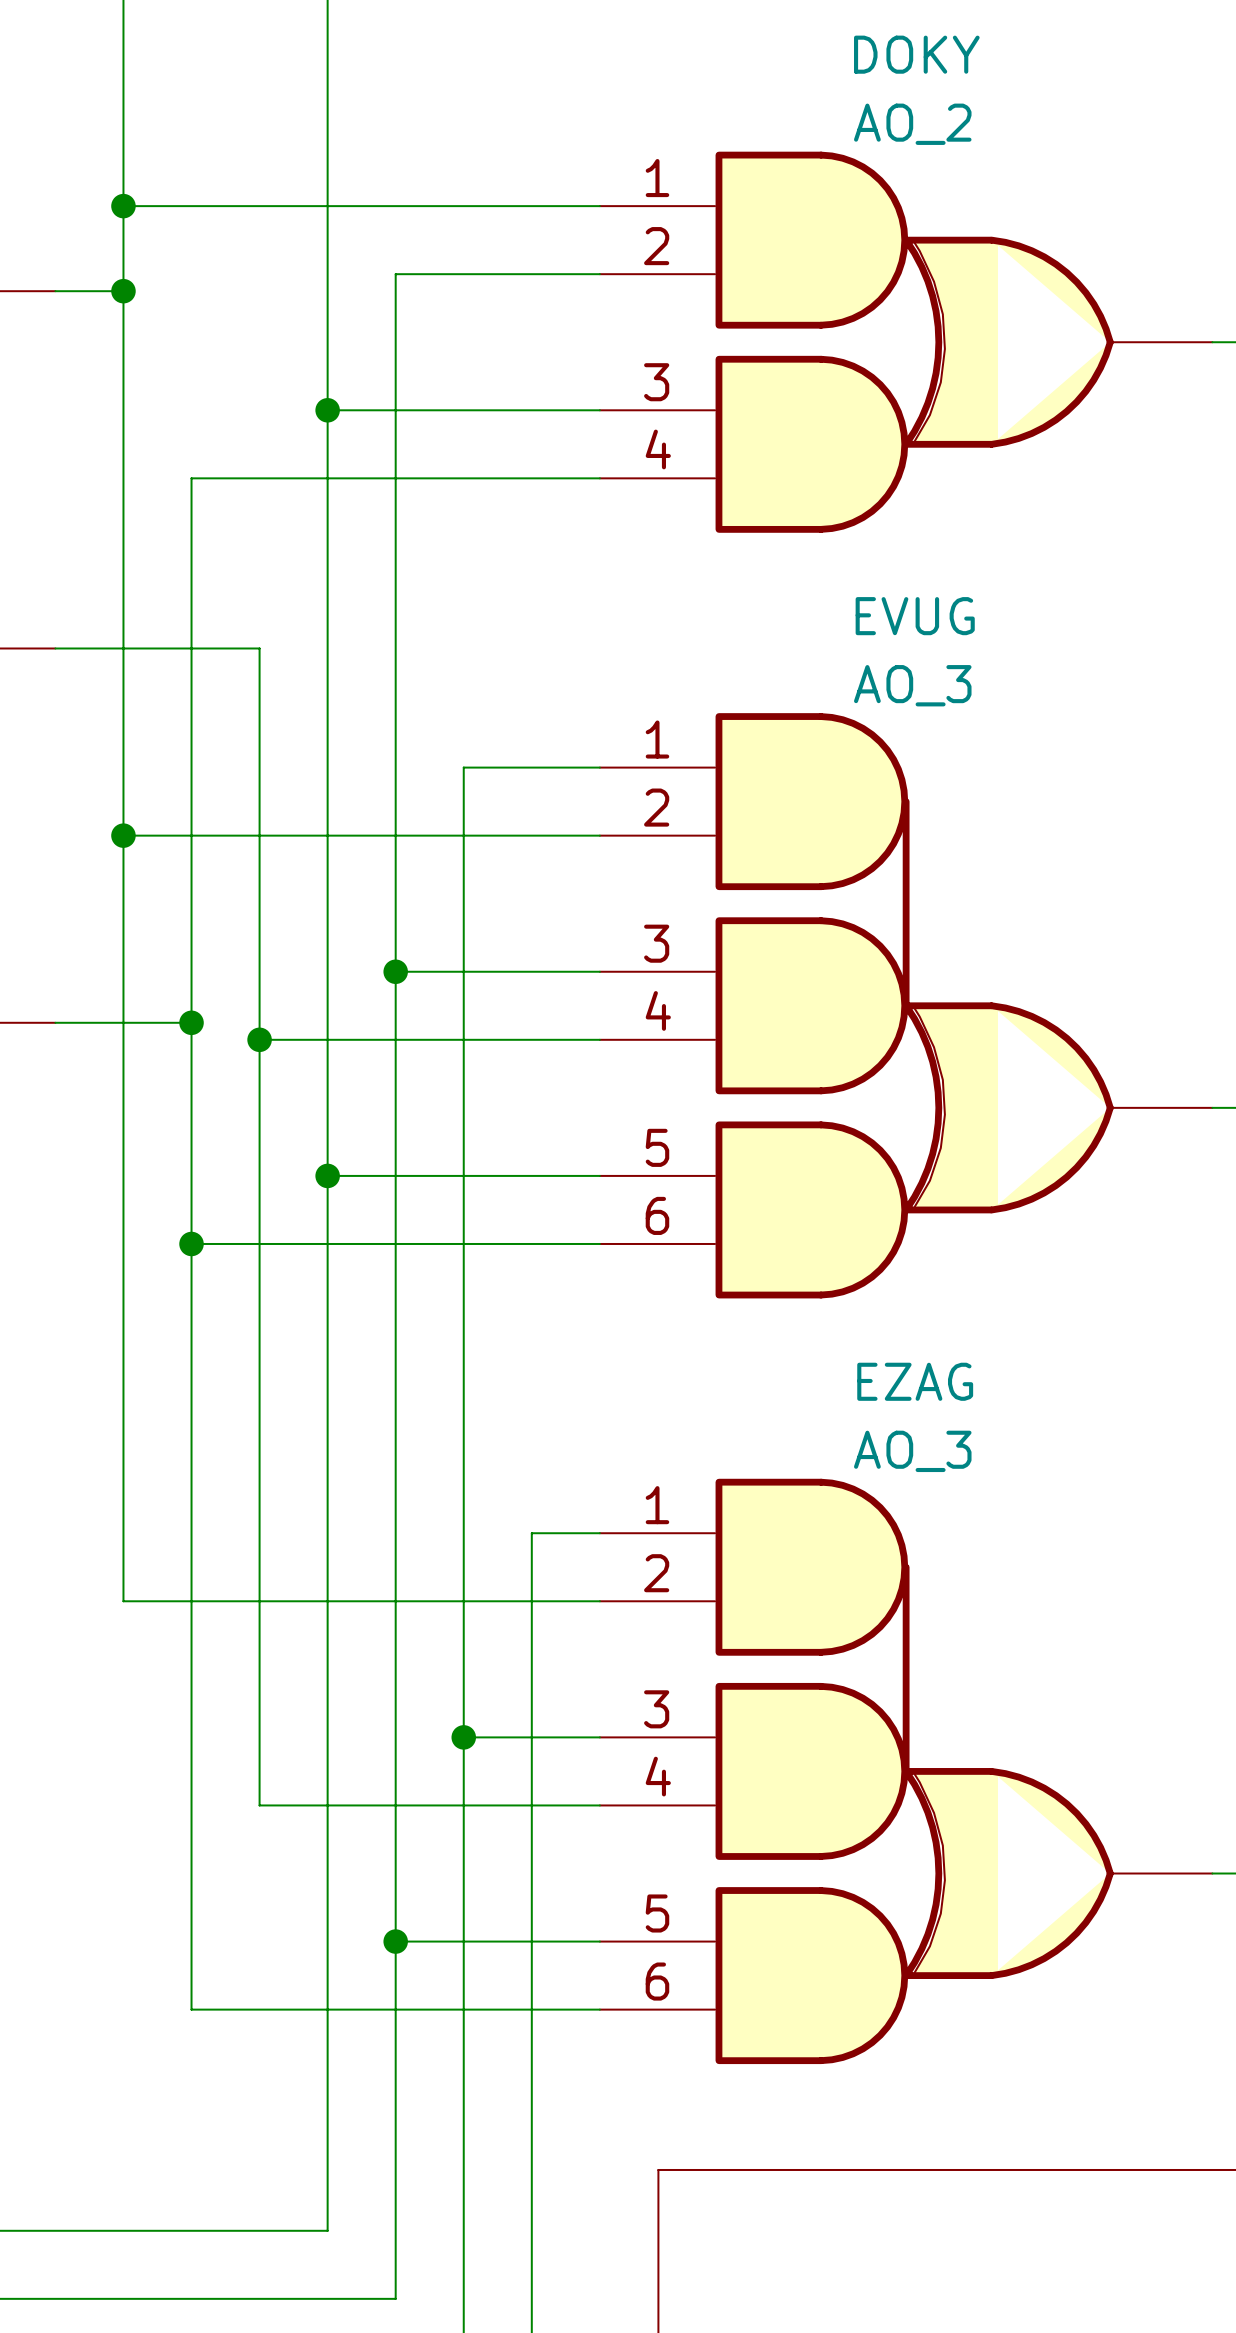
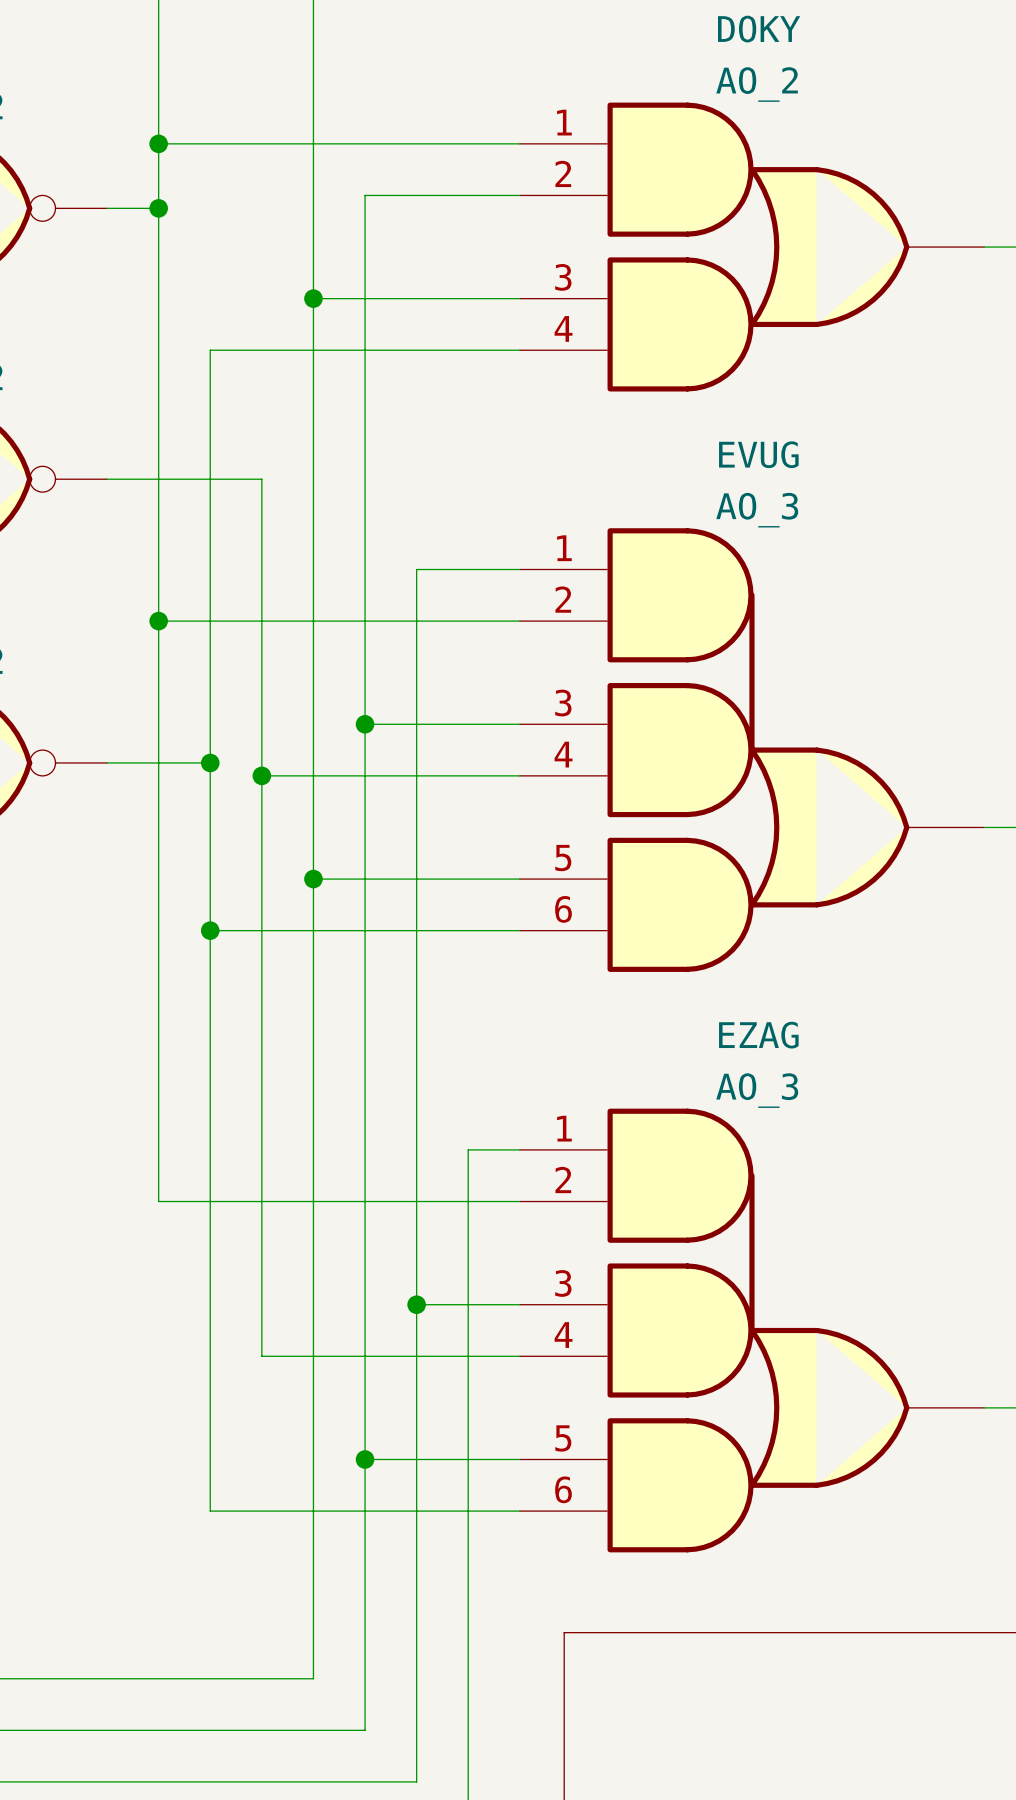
DOKY symbol: [599, 151, 1213, 533] -> [519, 102, 985, 392]
EVUG symbol: [599, 713, 1213, 1299] -> [519, 528, 985, 972]
EZAG symbol: [599, 1478, 1213, 2065] -> [519, 1108, 985, 1553]

